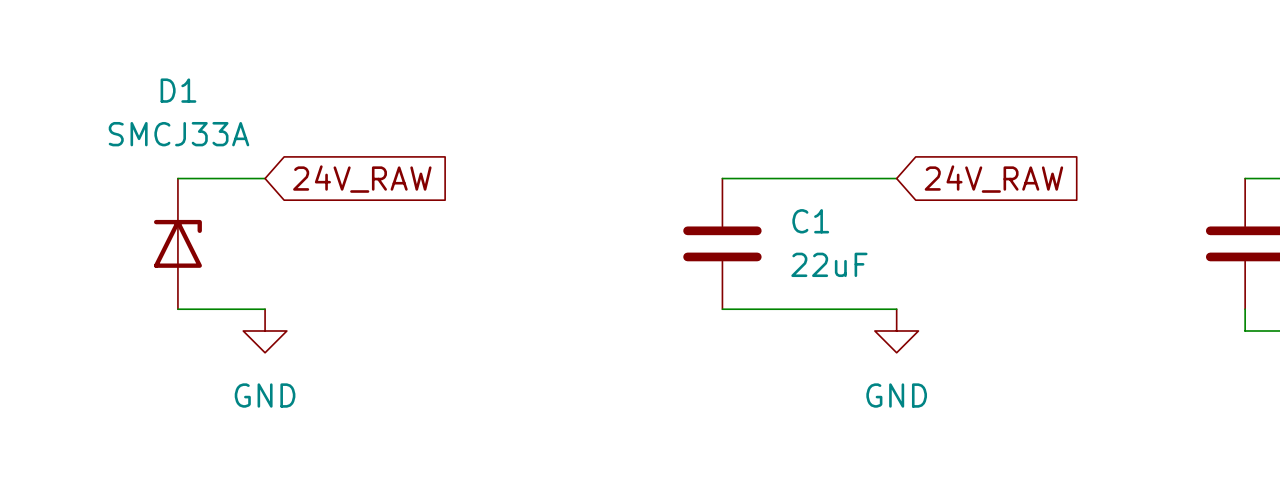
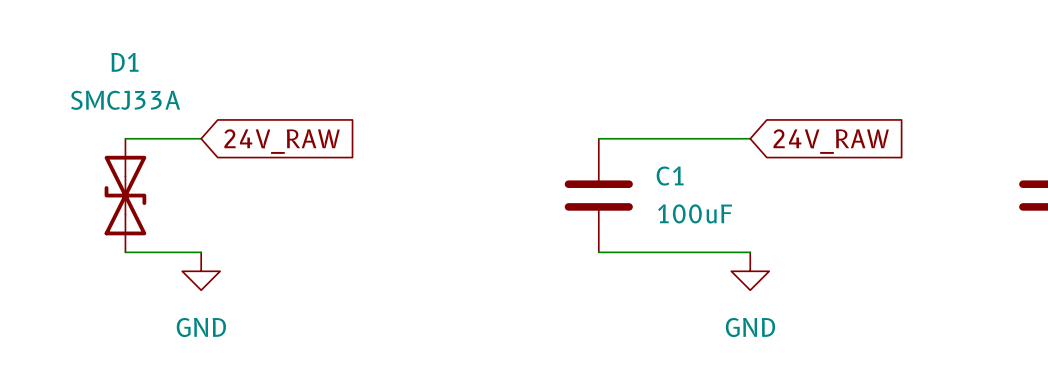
D1 symbol: [153, 178, 202, 310] -> [104, 138, 147, 253]
C1 value: 22uF (829, 264) -> 100uF (695, 213)

